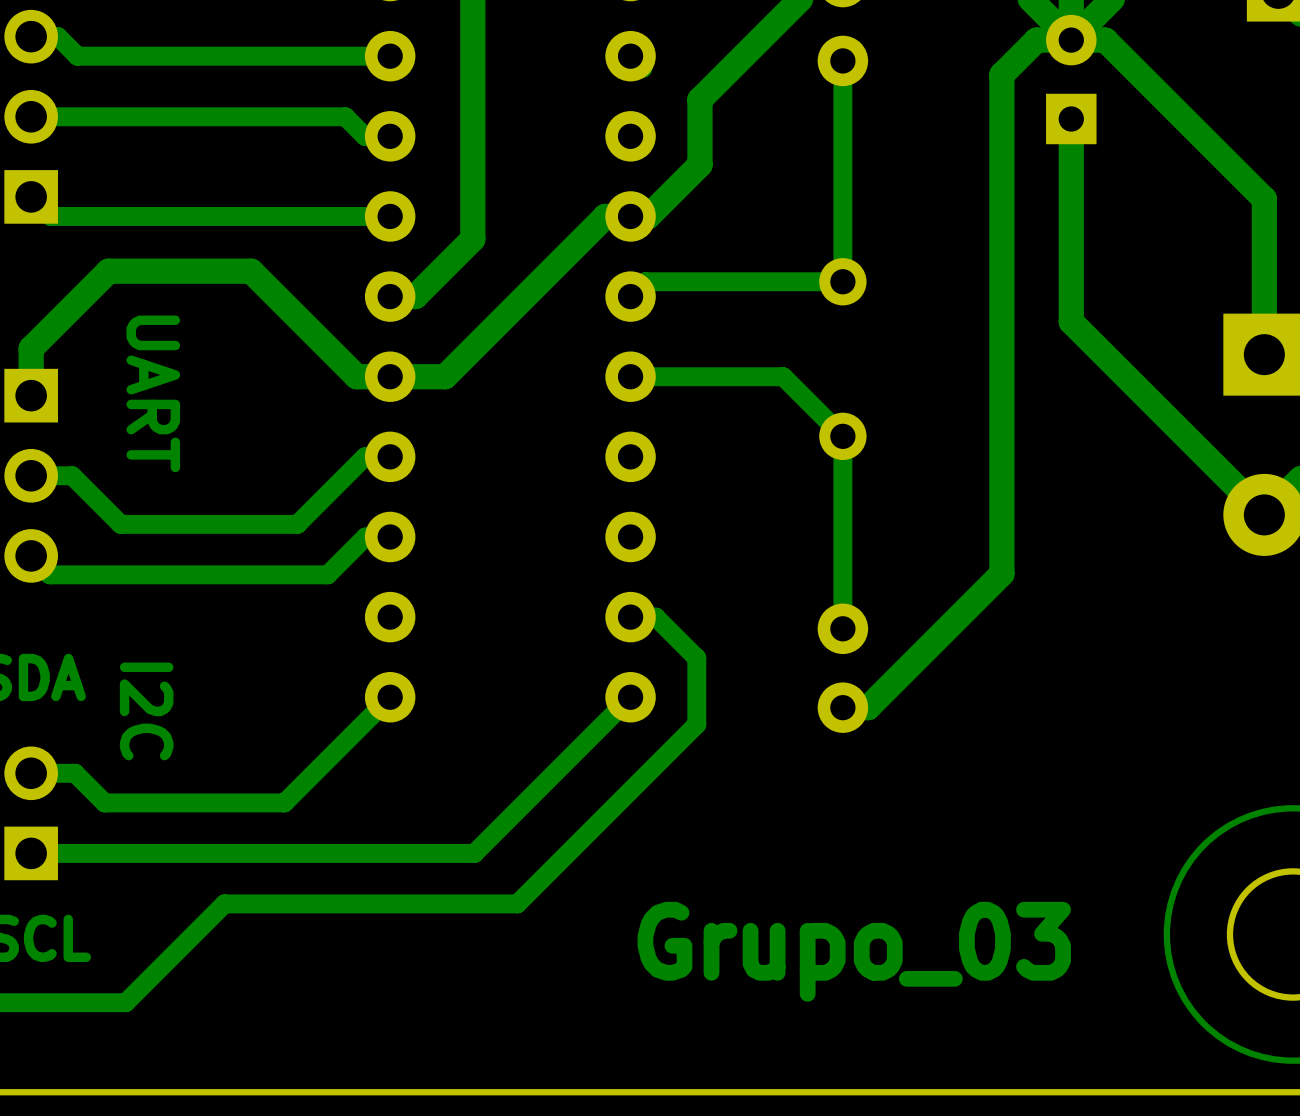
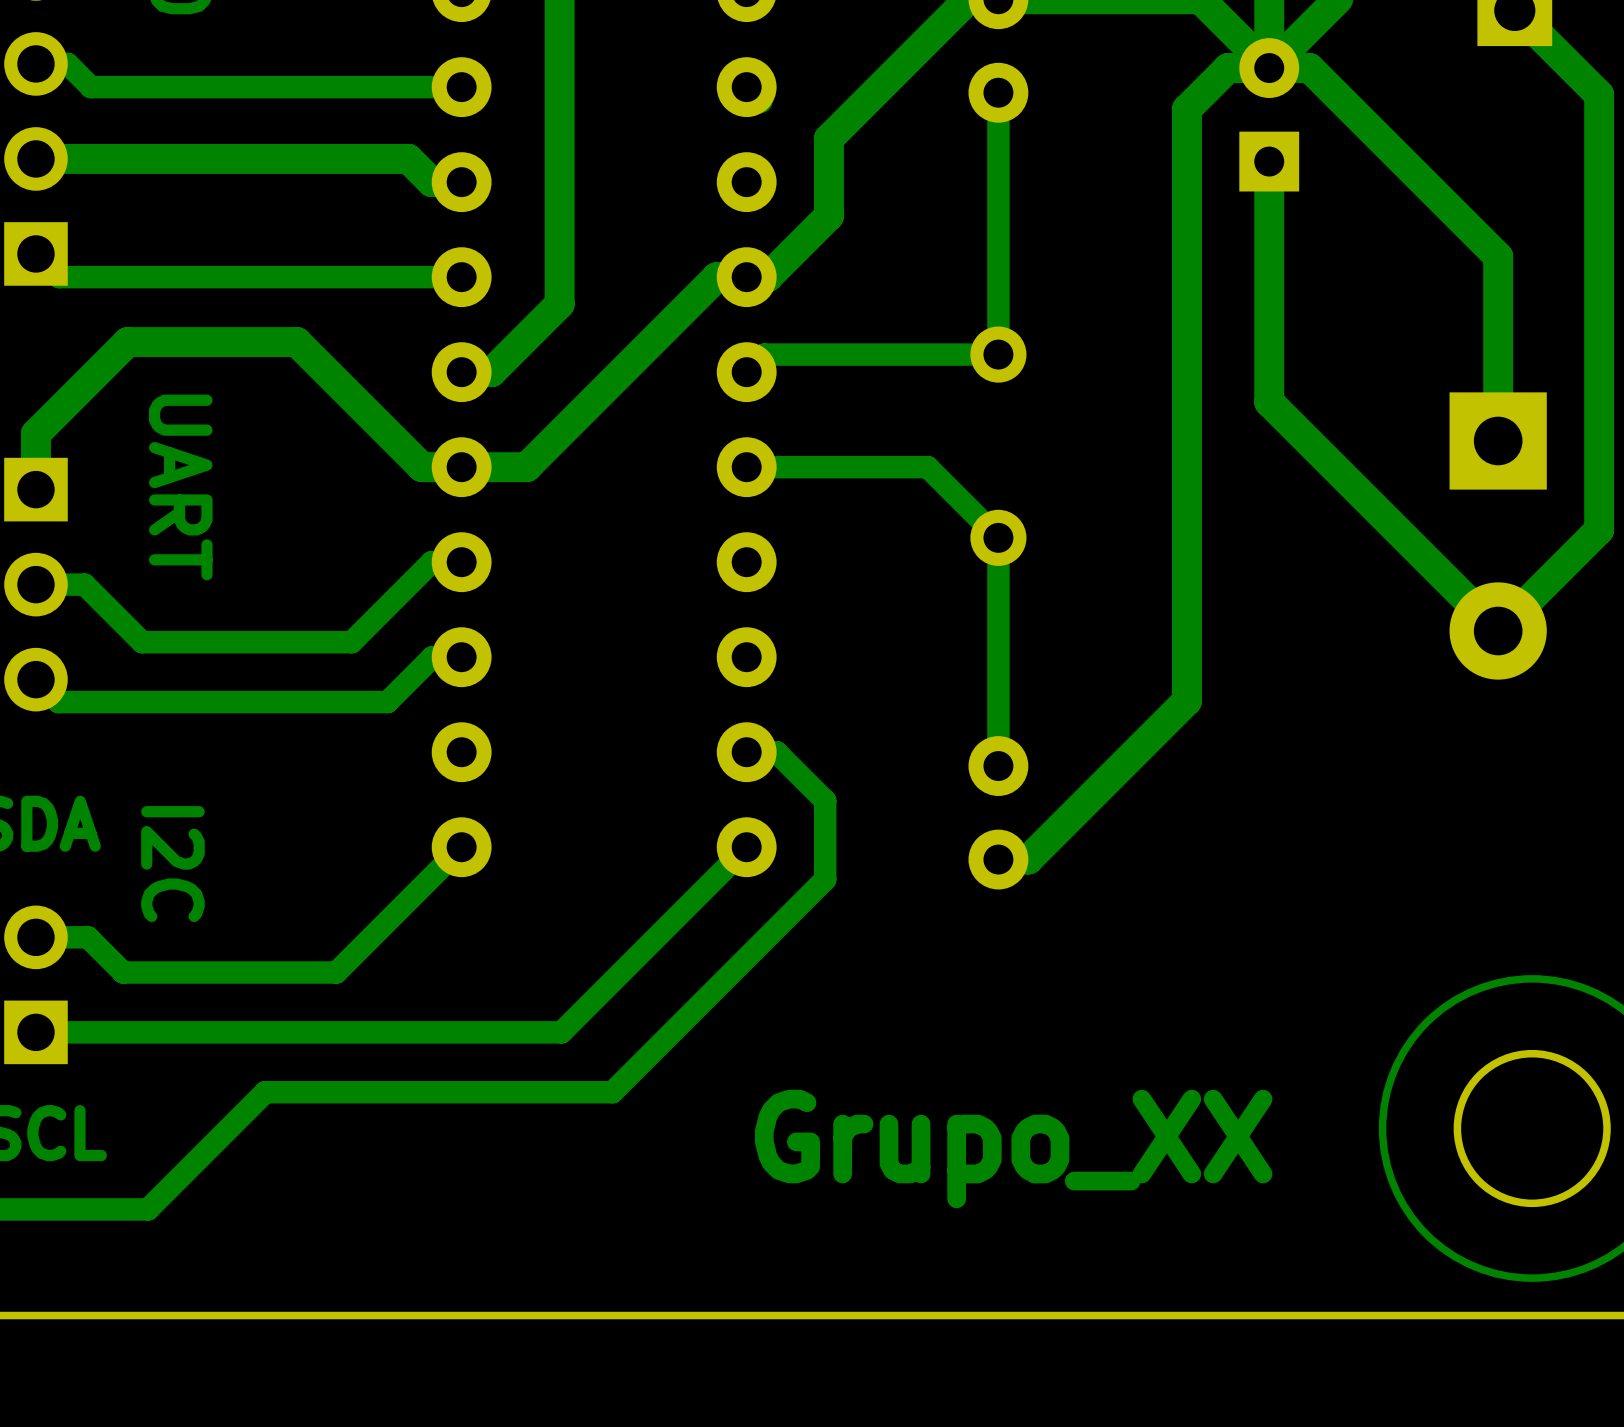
track width: thin (31, 116) (345, 116) (364, 136) (390, 136) (382, 128) -> thick (35, 158) (408, 158) (431, 182) (461, 182) (452, 173)
text: Grupo_03 (854, 951) -> Grupo_XX (1013, 1149)

